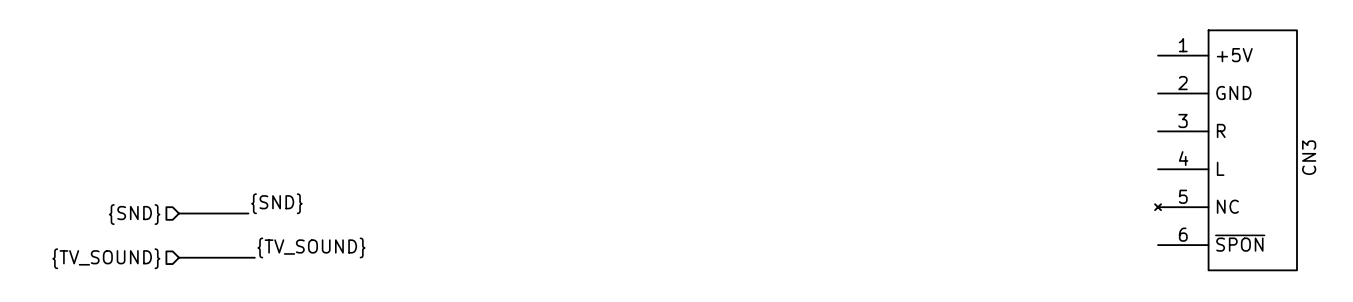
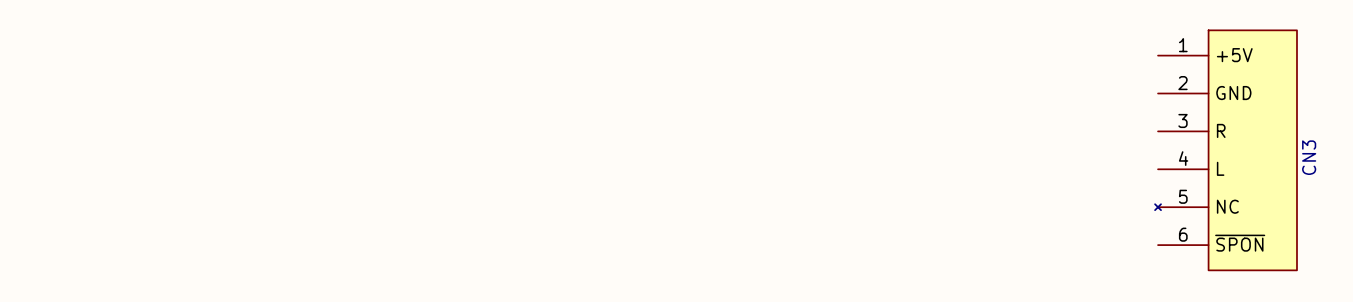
label: {SND} (276, 203) -> none
bus: (179, 213) (248, 213) -> none
hierarchical label: {SND} (134, 214) -> none
label: {TV_SOUND} (311, 247) -> none
bus: (179, 257) (254, 257) -> none
hierarchical label: {TV_SOUND} (106, 258) -> none

